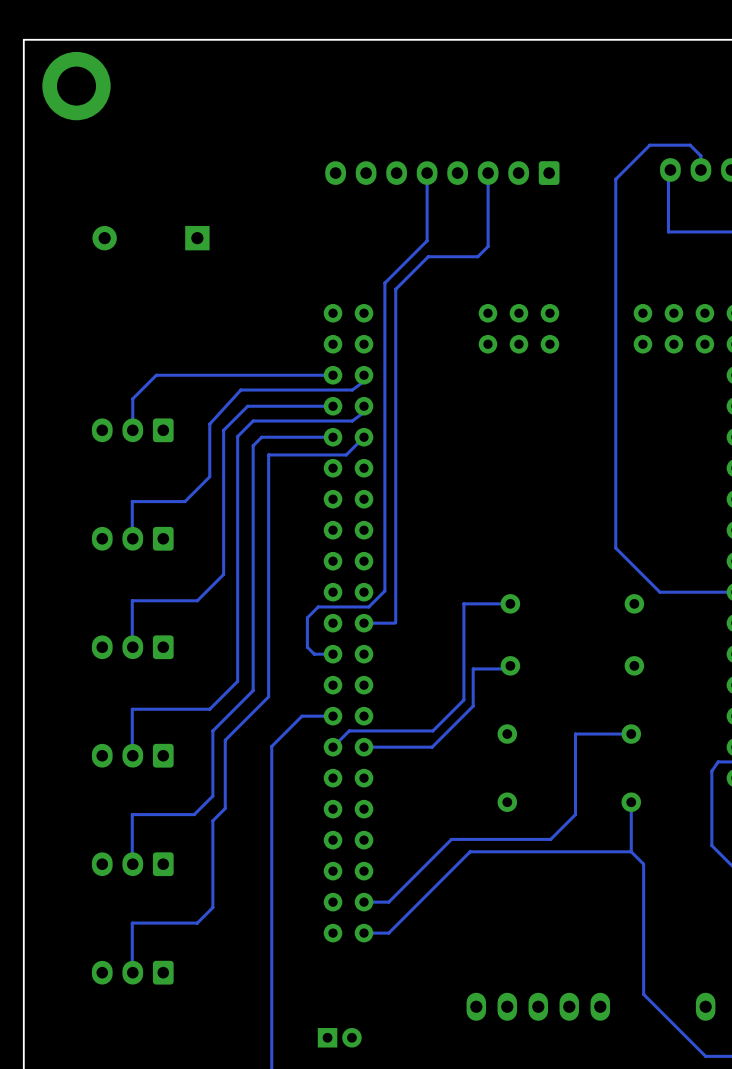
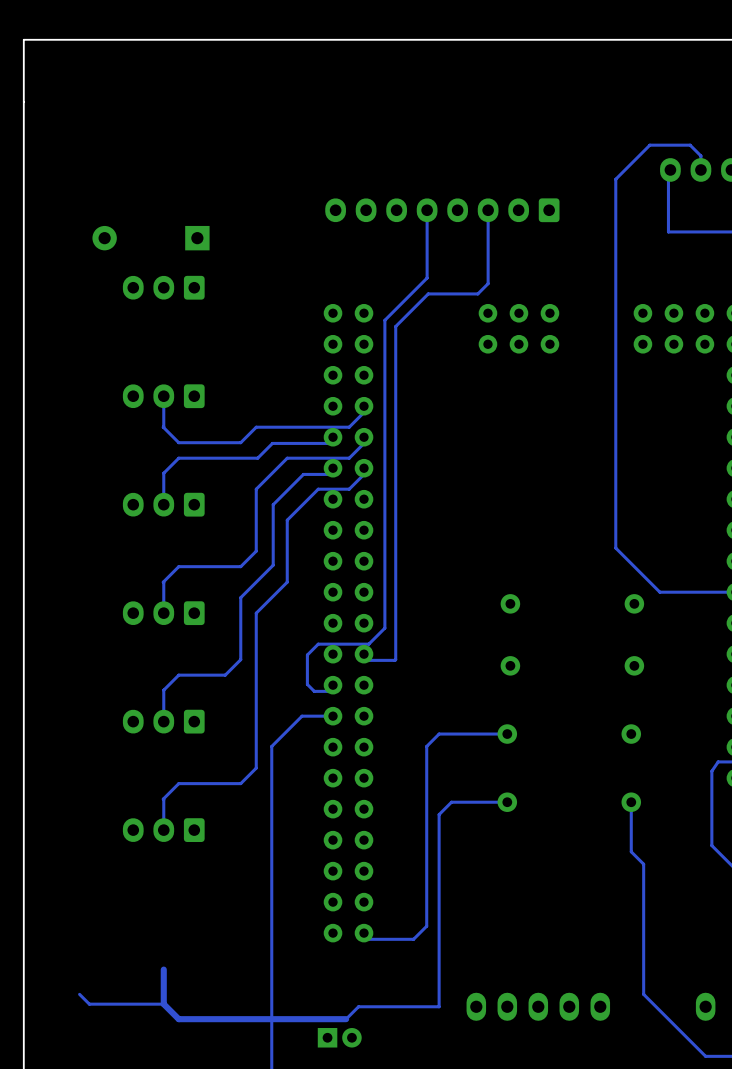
part: (76, 86) -> none
track: (427, 173) (427, 210) -> none
part position: (442, 173) -> (442, 210)
track: (488, 173) (488, 210) -> none
track: (427, 240) (384, 283) (384, 320) -> (427, 240) (427, 278) (384, 320)
track: (488, 246) (477, 256) (428, 256) (395, 289) (395, 326) -> (488, 246) (488, 283) (477, 293) (428, 293) (395, 326)
part: none -> (163, 287)
track: (333, 375) (156, 375) (132, 398) (132, 430) -> none
track: (364, 375) (364, 381) (352, 390) (240, 390) (209, 424) (209, 476) (184, 501) (132, 501) (132, 538) -> none
track: none -> (163, 396) (163, 427) (178, 442) (240, 442) (256, 427) (349, 427) (364, 412)
part: none -> (163, 396)
track: (333, 406) (247, 406) (223, 430) (223, 574) (197, 600) (132, 600) (132, 647) -> none
track: (364, 406) (364, 412) (352, 421) (253, 421) (237, 436) (237, 681) (209, 709) (132, 709) (132, 755) -> none
part: (132, 430) -> none
track: (333, 437) (261, 437) (253, 445) (253, 690) (212, 730) (212, 796) (194, 814) (132, 814) (132, 864) -> none
track: (364, 437) (346, 454) (268, 454) -> none
track: none -> (333, 443) (272, 443) (257, 458) (178, 458) (163, 473) (163, 504)
track: none -> (364, 443) (349, 458) (287, 458) (256, 489) (256, 551) (240, 566) (178, 566) (163, 582) (163, 613)
track: (268, 455) (268, 696) (225, 740) (225, 808) (212, 820) (212, 907) (197, 923) (132, 923) (132, 972) -> none
track: none -> (333, 474) (303, 474) (273, 504) (273, 565) (240, 597) (240, 659) (225, 675) (178, 675) (163, 690) (163, 721)
track: none -> (364, 474) (349, 489) (318, 489) (287, 520) (287, 582) (256, 613) (256, 768) (240, 783) (178, 783) (163, 799) (163, 830)
part: none -> (163, 504)
part: (132, 538) -> none
track: (384, 590) (368, 606) (318, 606) (307, 617) (307, 647) (314, 654) (333, 654) -> (384, 590) (384, 628) (368, 644) (318, 644) (307, 655) (307, 684) (314, 691) (333, 691)
track: (510, 603) (463, 603) (463, 699) (432, 730) (349, 730) (333, 747) -> none
part: none -> (163, 613)
track: none -> (395, 622) (395, 659) (364, 660)
track: (395, 623) (364, 623) -> none
part: (132, 647) -> none
track: (510, 665) (507, 668) (473, 668) (473, 706) (432, 747) (364, 747) -> none
part: none -> (163, 721)
track: none -> (507, 734) (439, 734) (426, 746) (426, 926) (413, 939) (364, 939)
track: (631, 734) (575, 734) (575, 814) (550, 839) (451, 839) (388, 902) (364, 902) -> none
part: (132, 755) -> none
track: none -> (507, 802) (451, 802) (439, 814) (439, 1006) (358, 1006) (346, 1019) (178, 1019) (163, 1004)
part: none -> (163, 830)
track: (631, 851) (470, 851) (388, 933) (364, 933) -> none
part: (132, 864) -> none
track: none -> (163, 969) (163, 1004)
part: (132, 972) -> none
track: none -> (79, 994) (89, 1004) (163, 1004)

